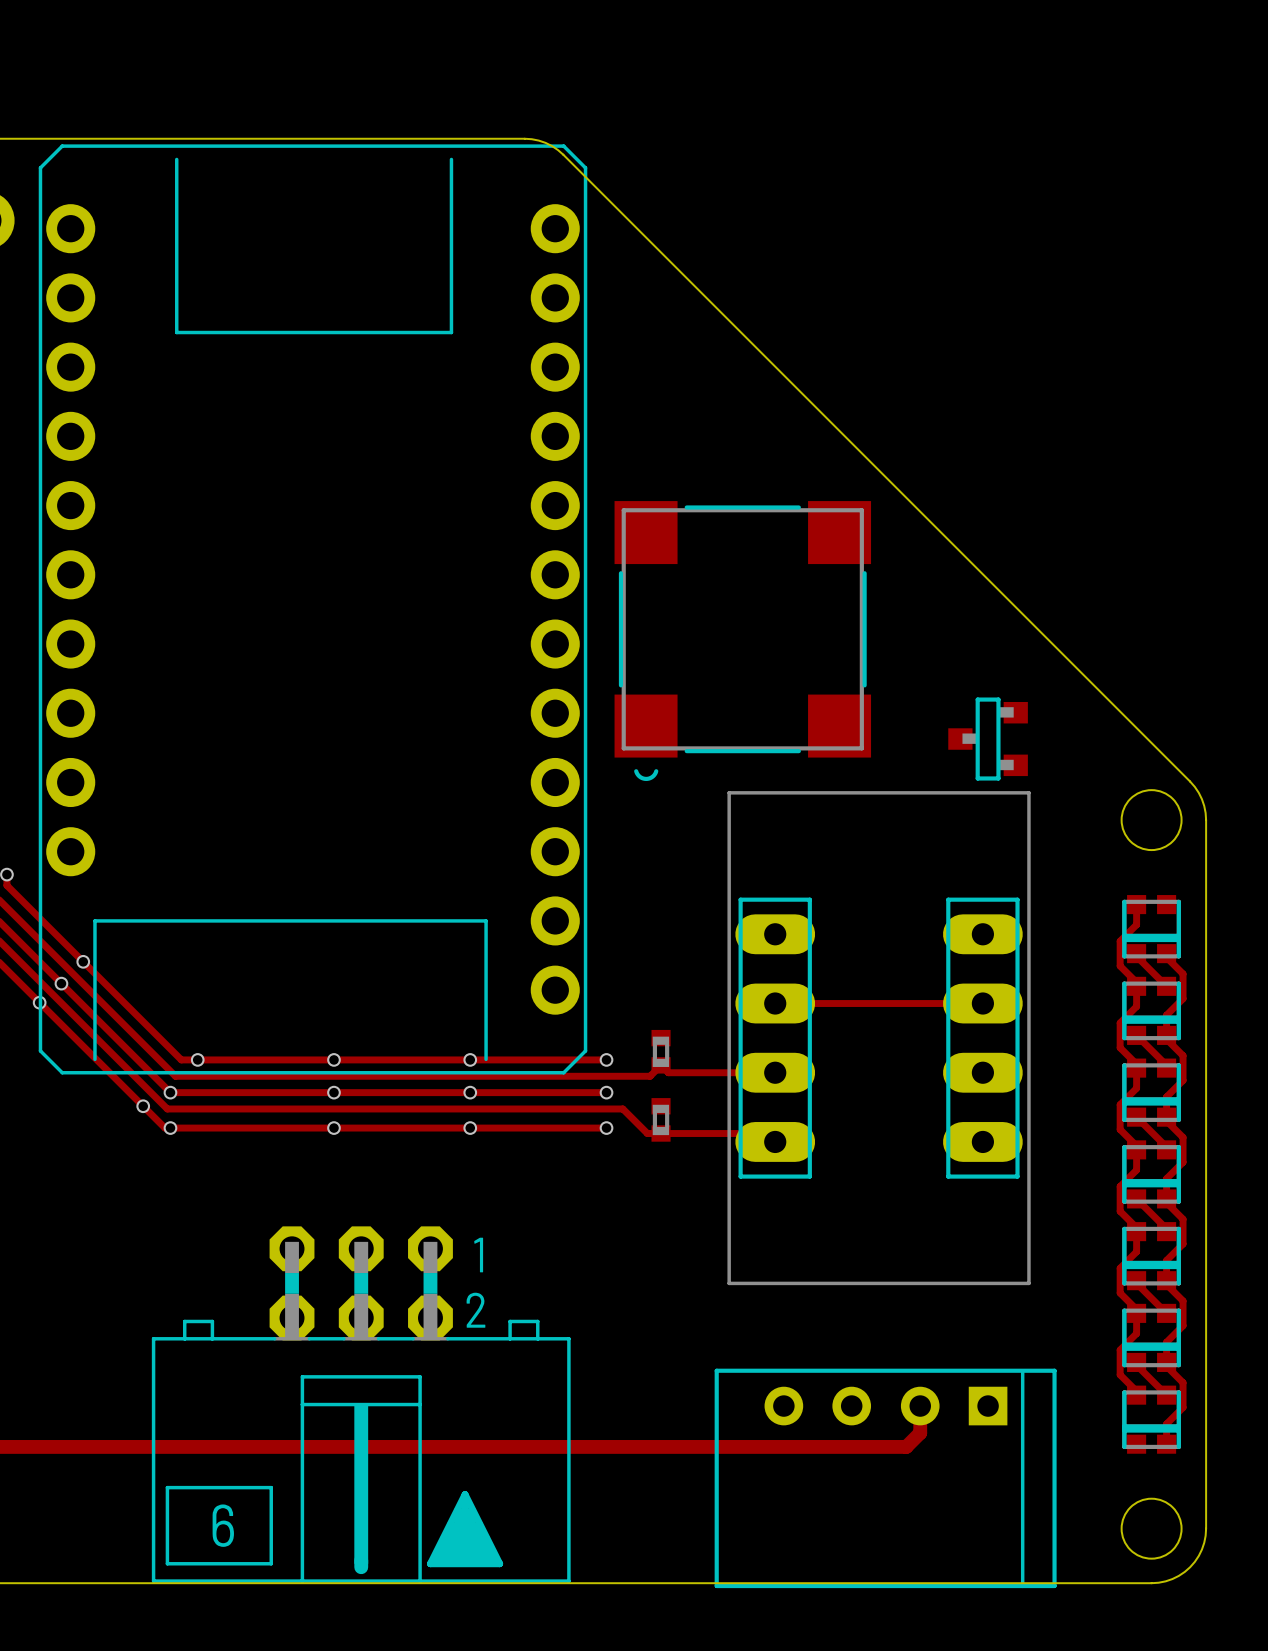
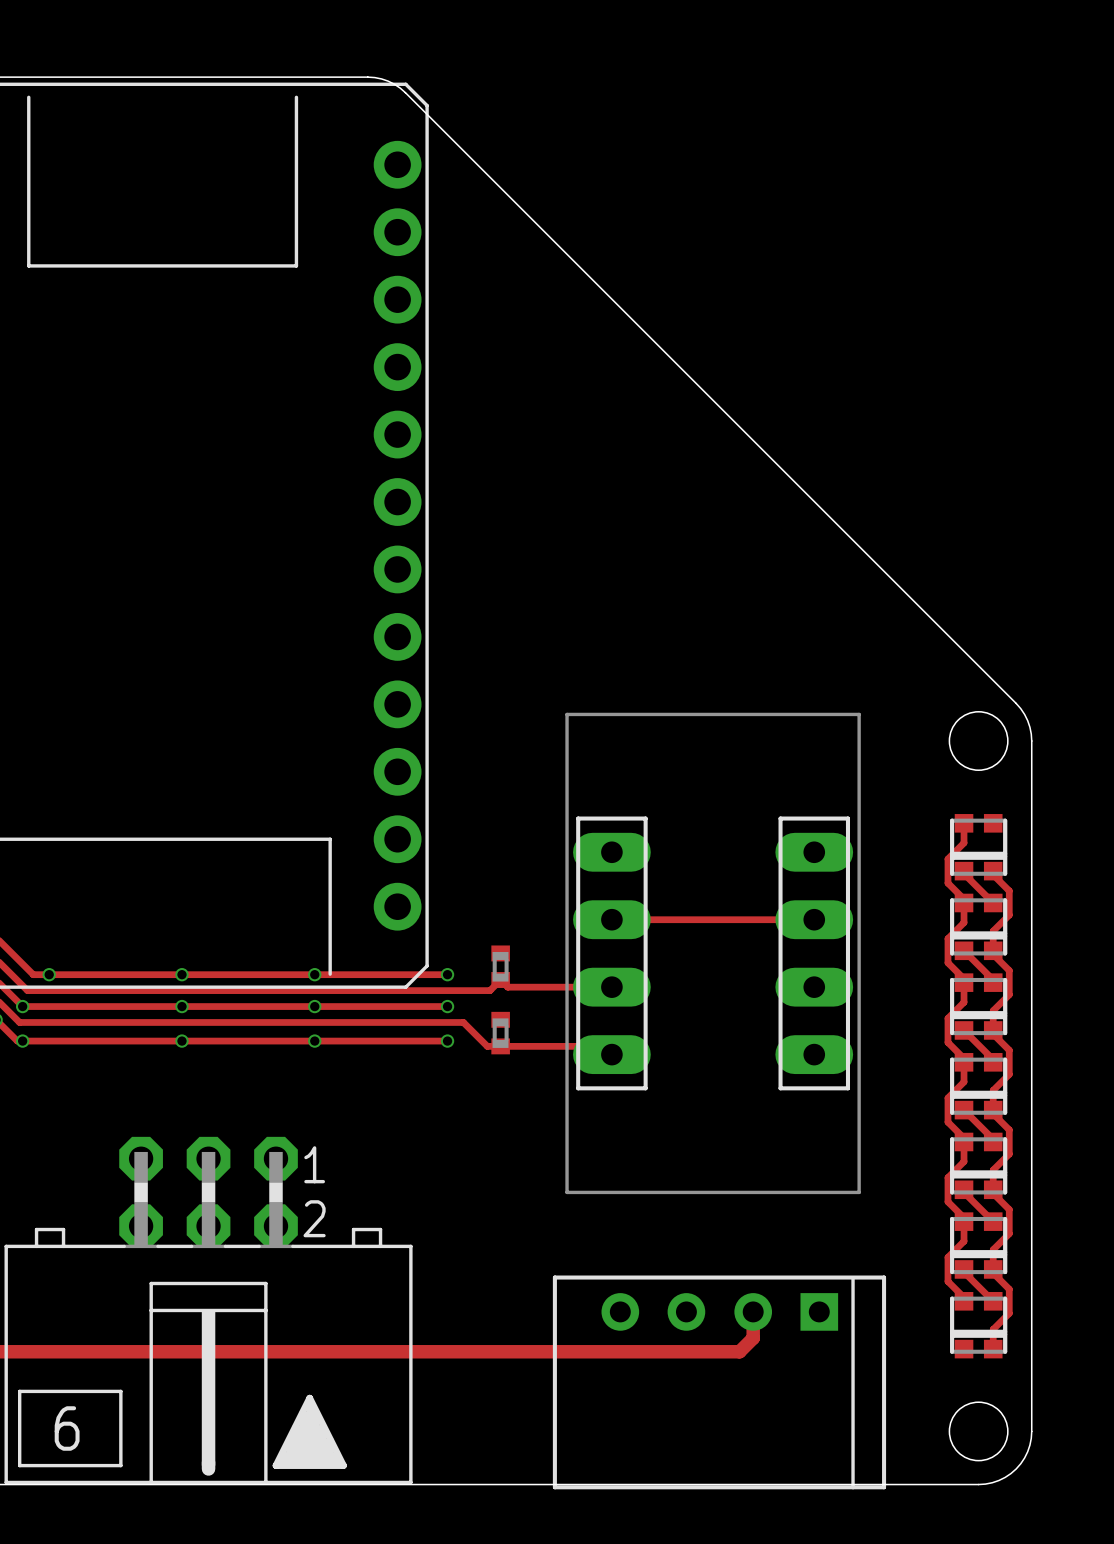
part: (742, 641) -> none
part: (988, 739) -> none

